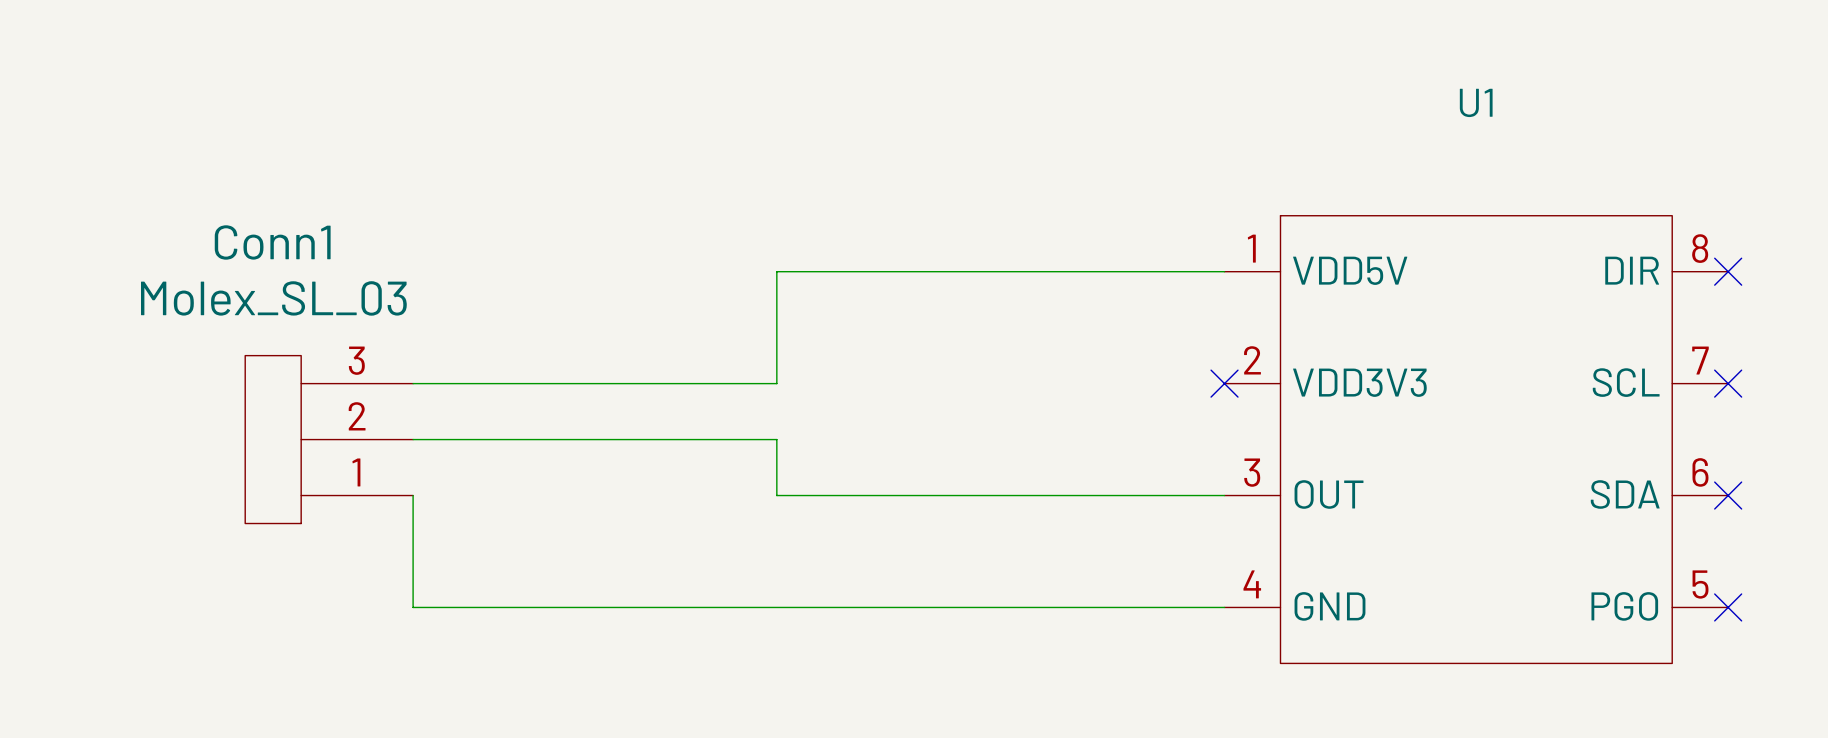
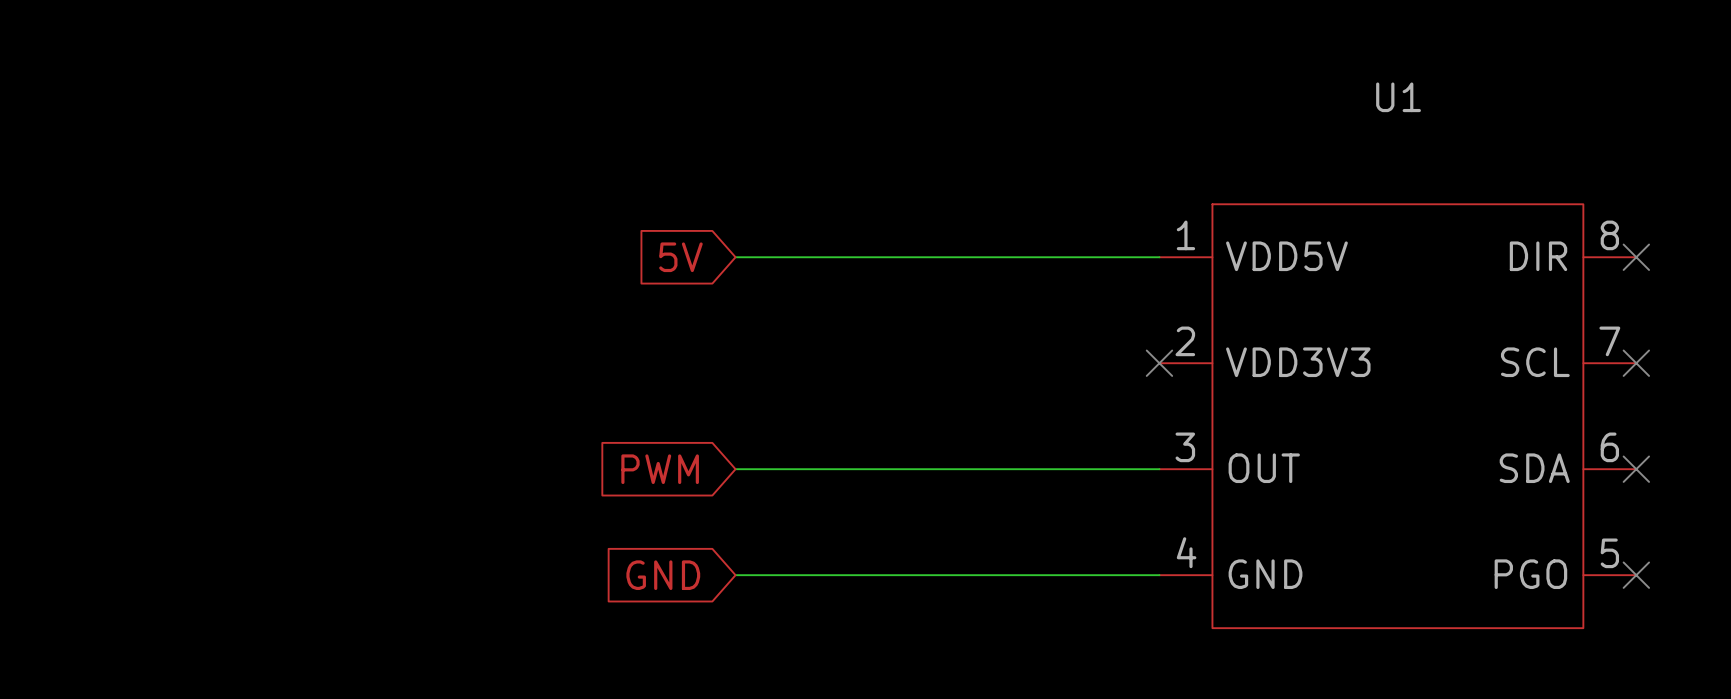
global label: none -> 5V (680, 257)
wire: (776, 271) (776, 383) (413, 383) -> none
Conn1: Molex_SL_03 (329, 439) -> none
wire: (413, 439) (776, 439) (776, 495) -> none
wire: (413, 495) (413, 607) (776, 607) -> none
global label: none -> PWM (660, 469)
global label: none -> GND (663, 575)

